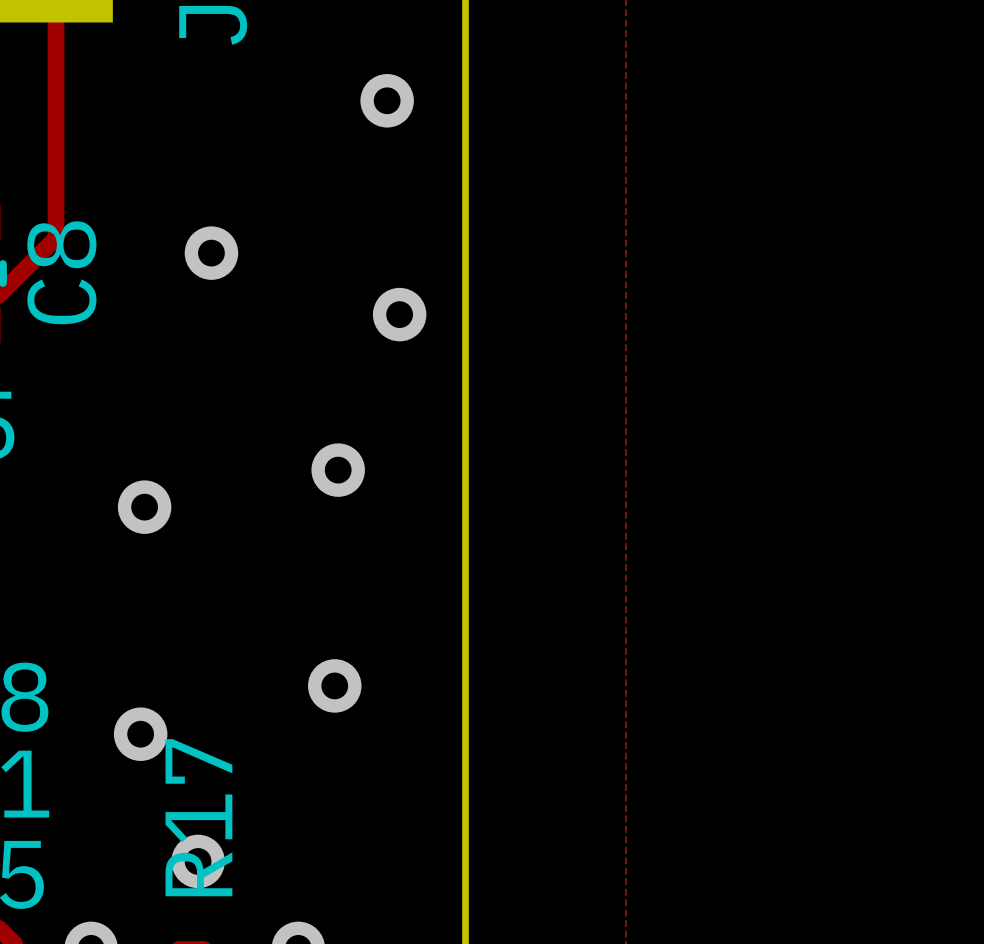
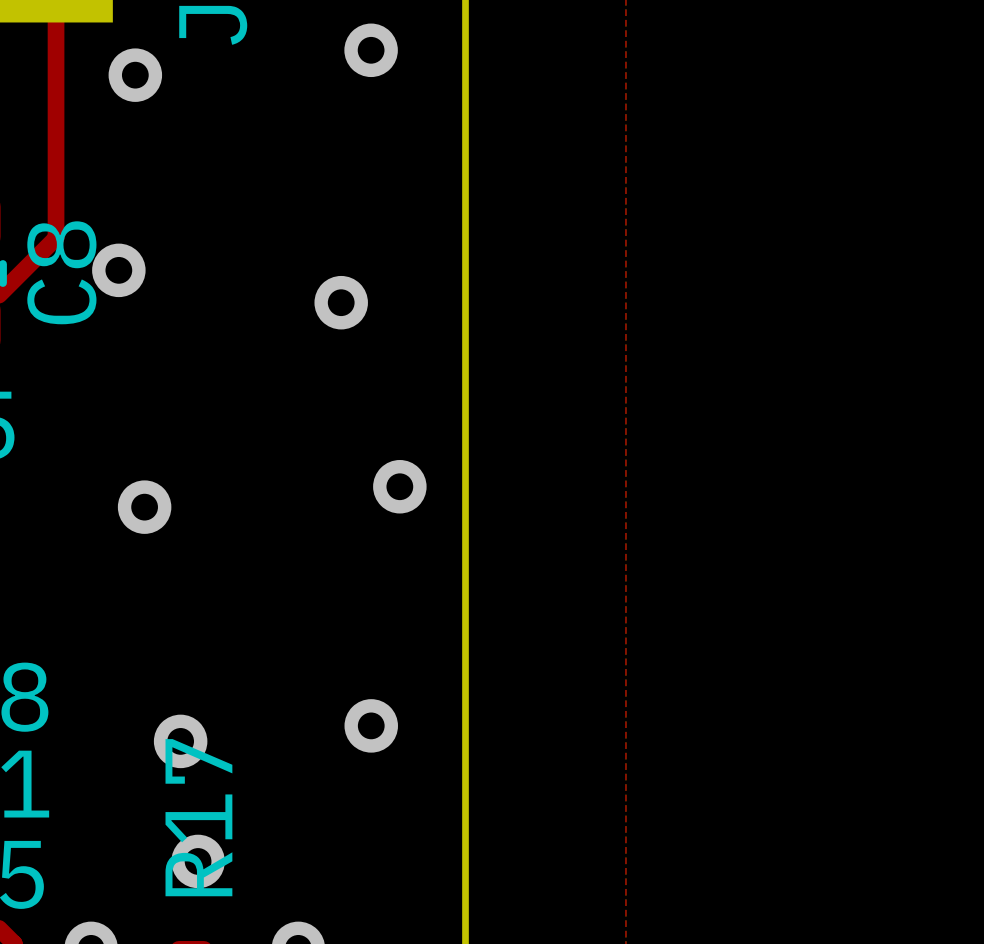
via: none -> (135, 75)
via position: (387, 100) -> (371, 50)
via: (211, 253) -> none
via: none -> (118, 270)
via position: (399, 314) -> (341, 302)
via position: (338, 470) -> (399, 486)
via position: (334, 685) -> (371, 725)
via position: (140, 734) -> (180, 741)

